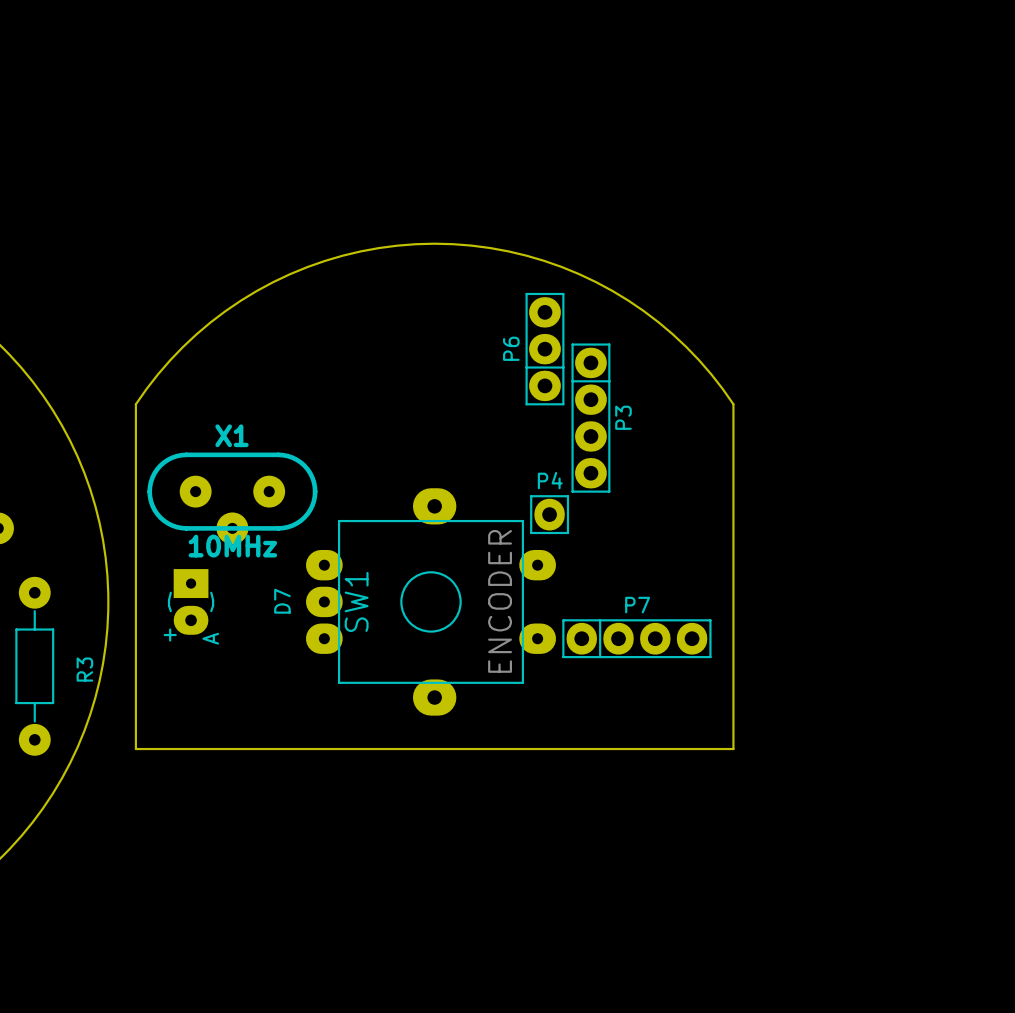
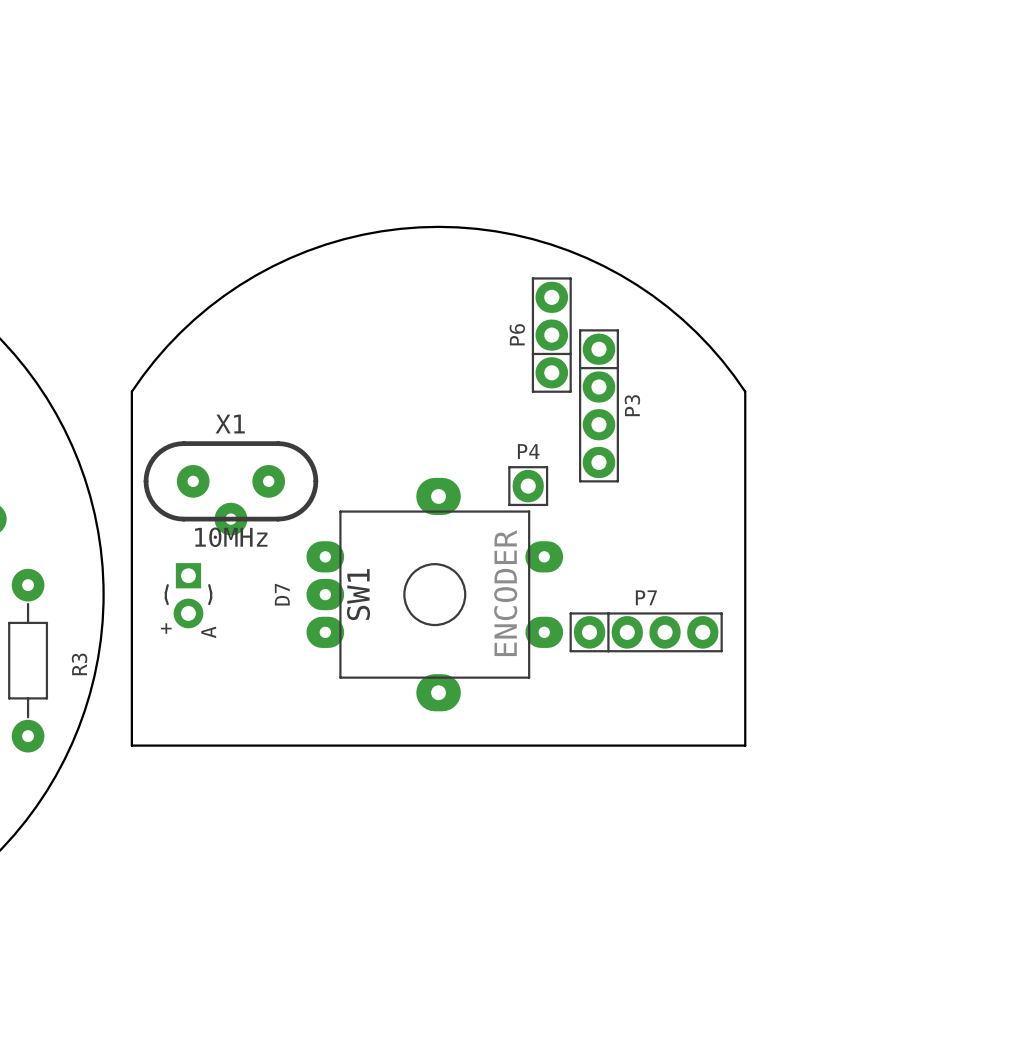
P4 position: (549, 514) -> (528, 486)
D7 footprint: [167, 569, 215, 635] -> [164, 563, 213, 629]

